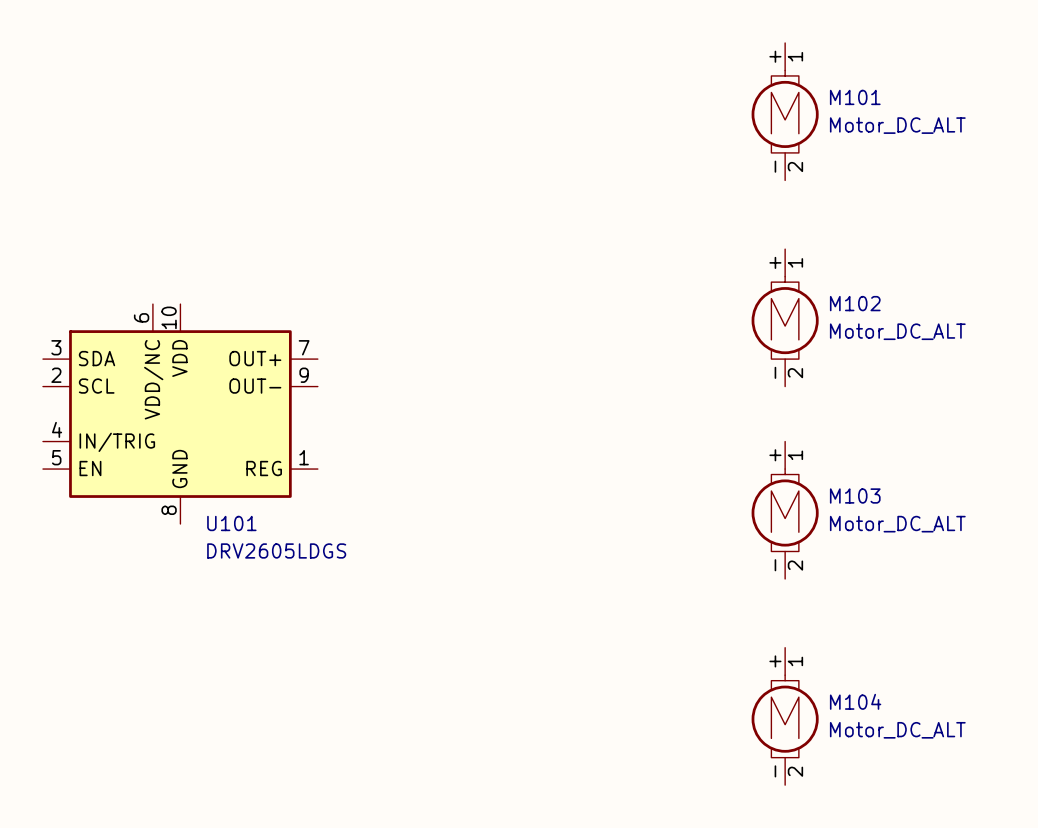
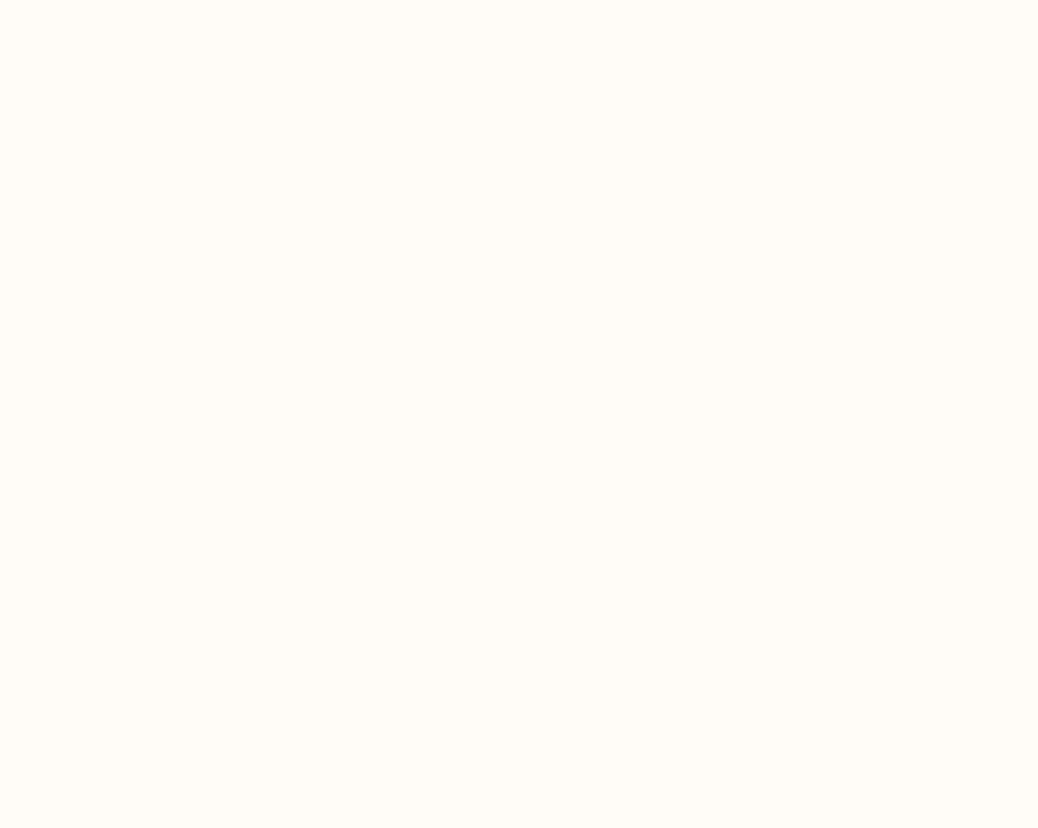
M101: Motor_DC_ALT (785, 111) -> none
M102: Motor_DC_ALT (785, 317) -> none
U101: DRV2605LDGS (180, 414) -> none
M103: Motor_DC_ALT (785, 510) -> none
M104: Motor_DC_ALT (785, 716) -> none

